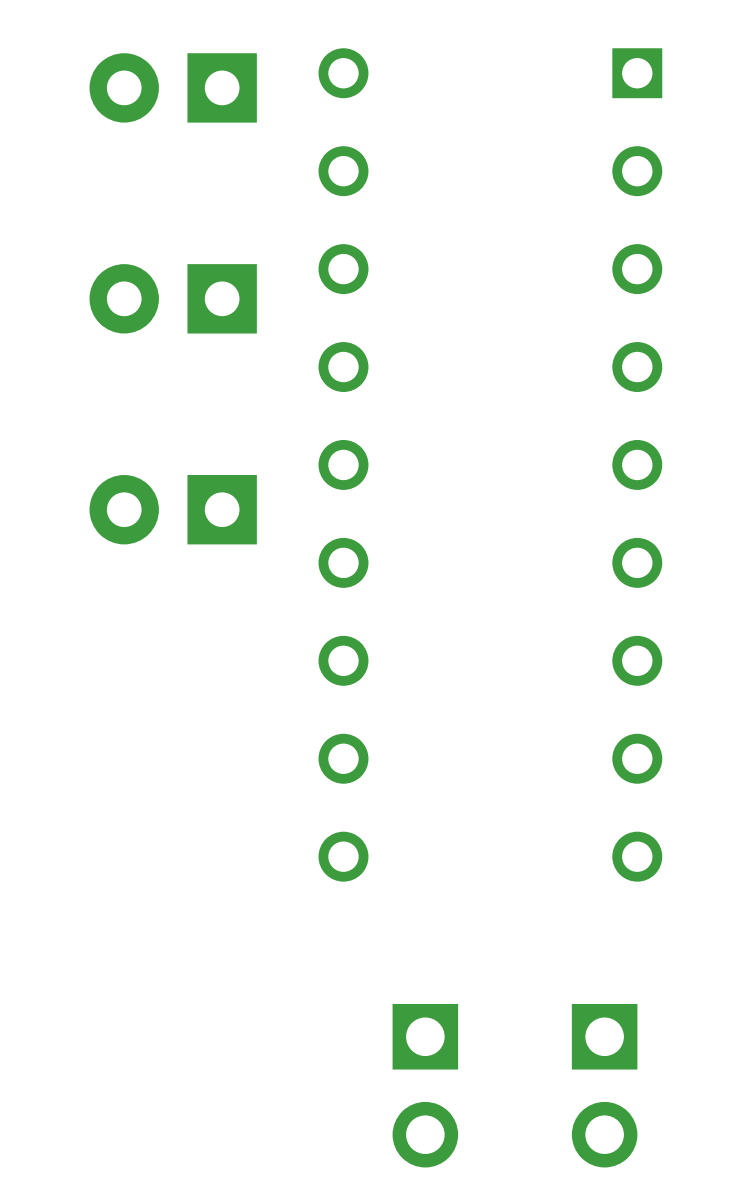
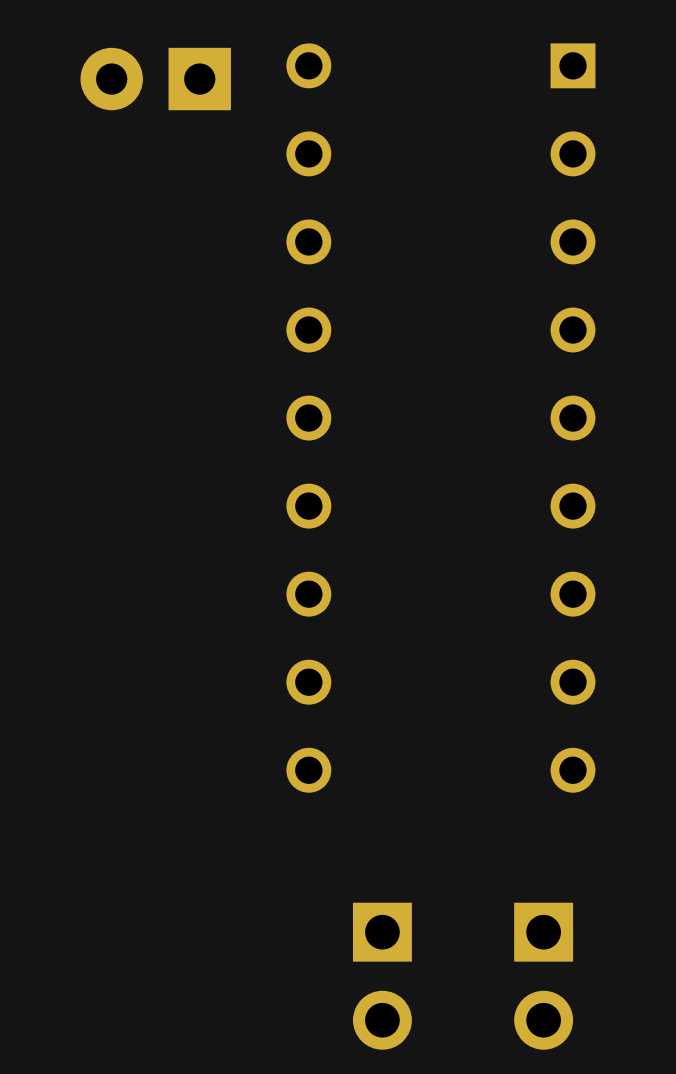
part: (173, 298) -> none
part: (173, 509) -> none

